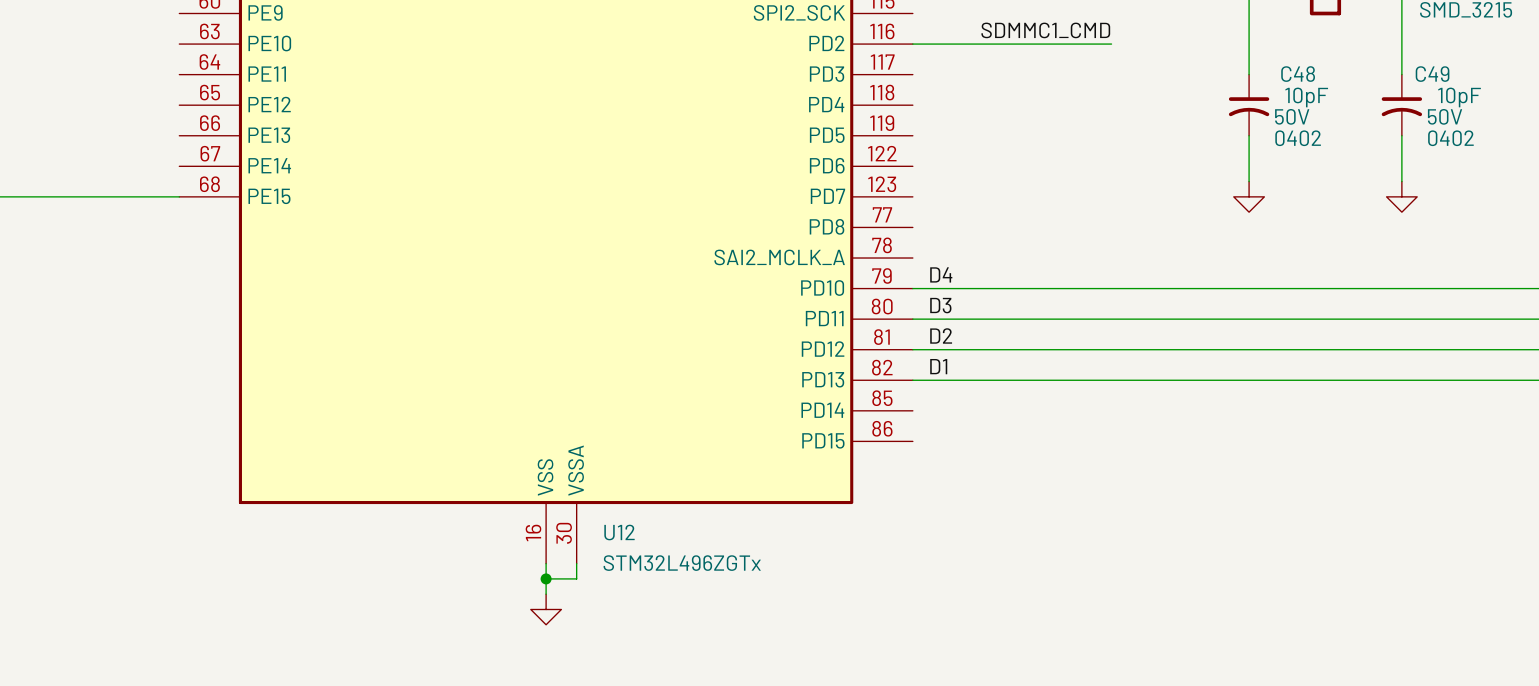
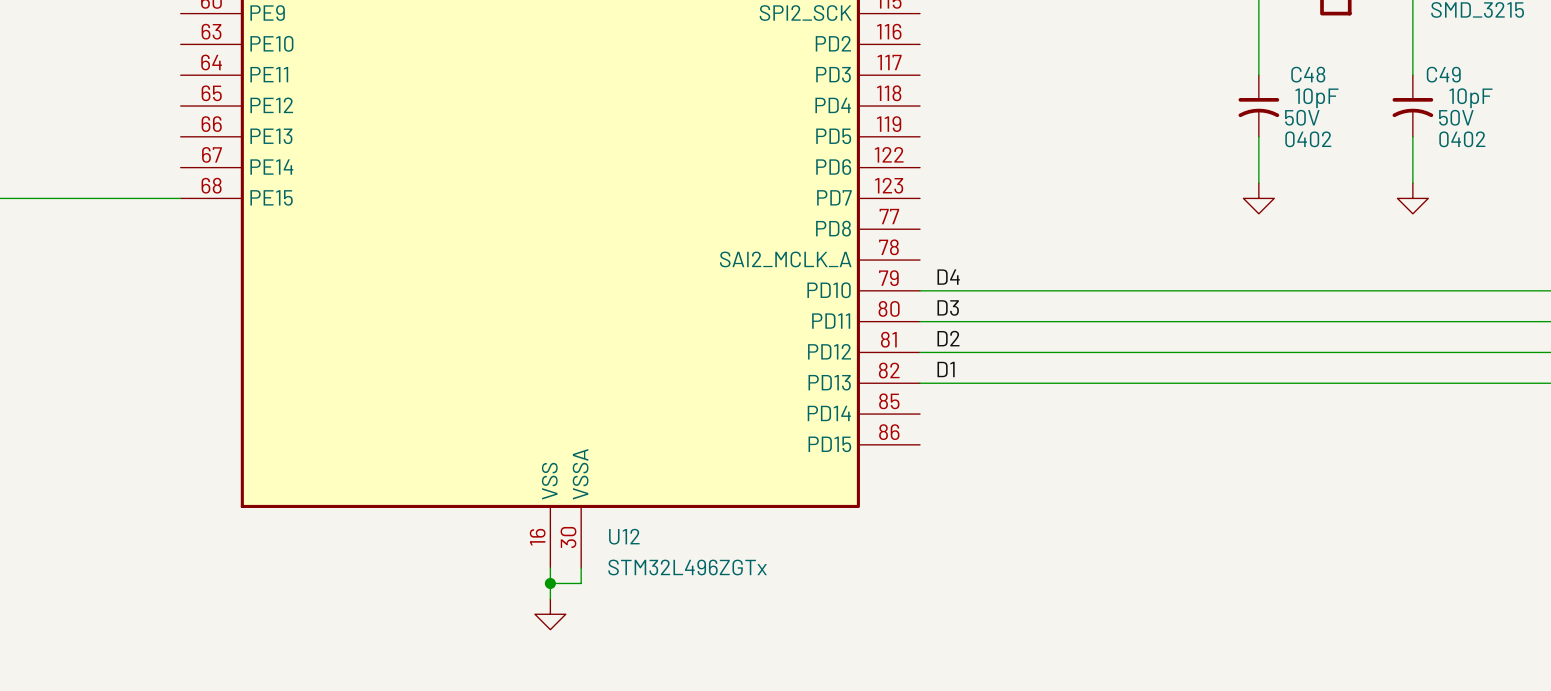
label: SDMMC1_CMD (1045, 30) -> none
wire: (912, 44) (1111, 44) -> none

